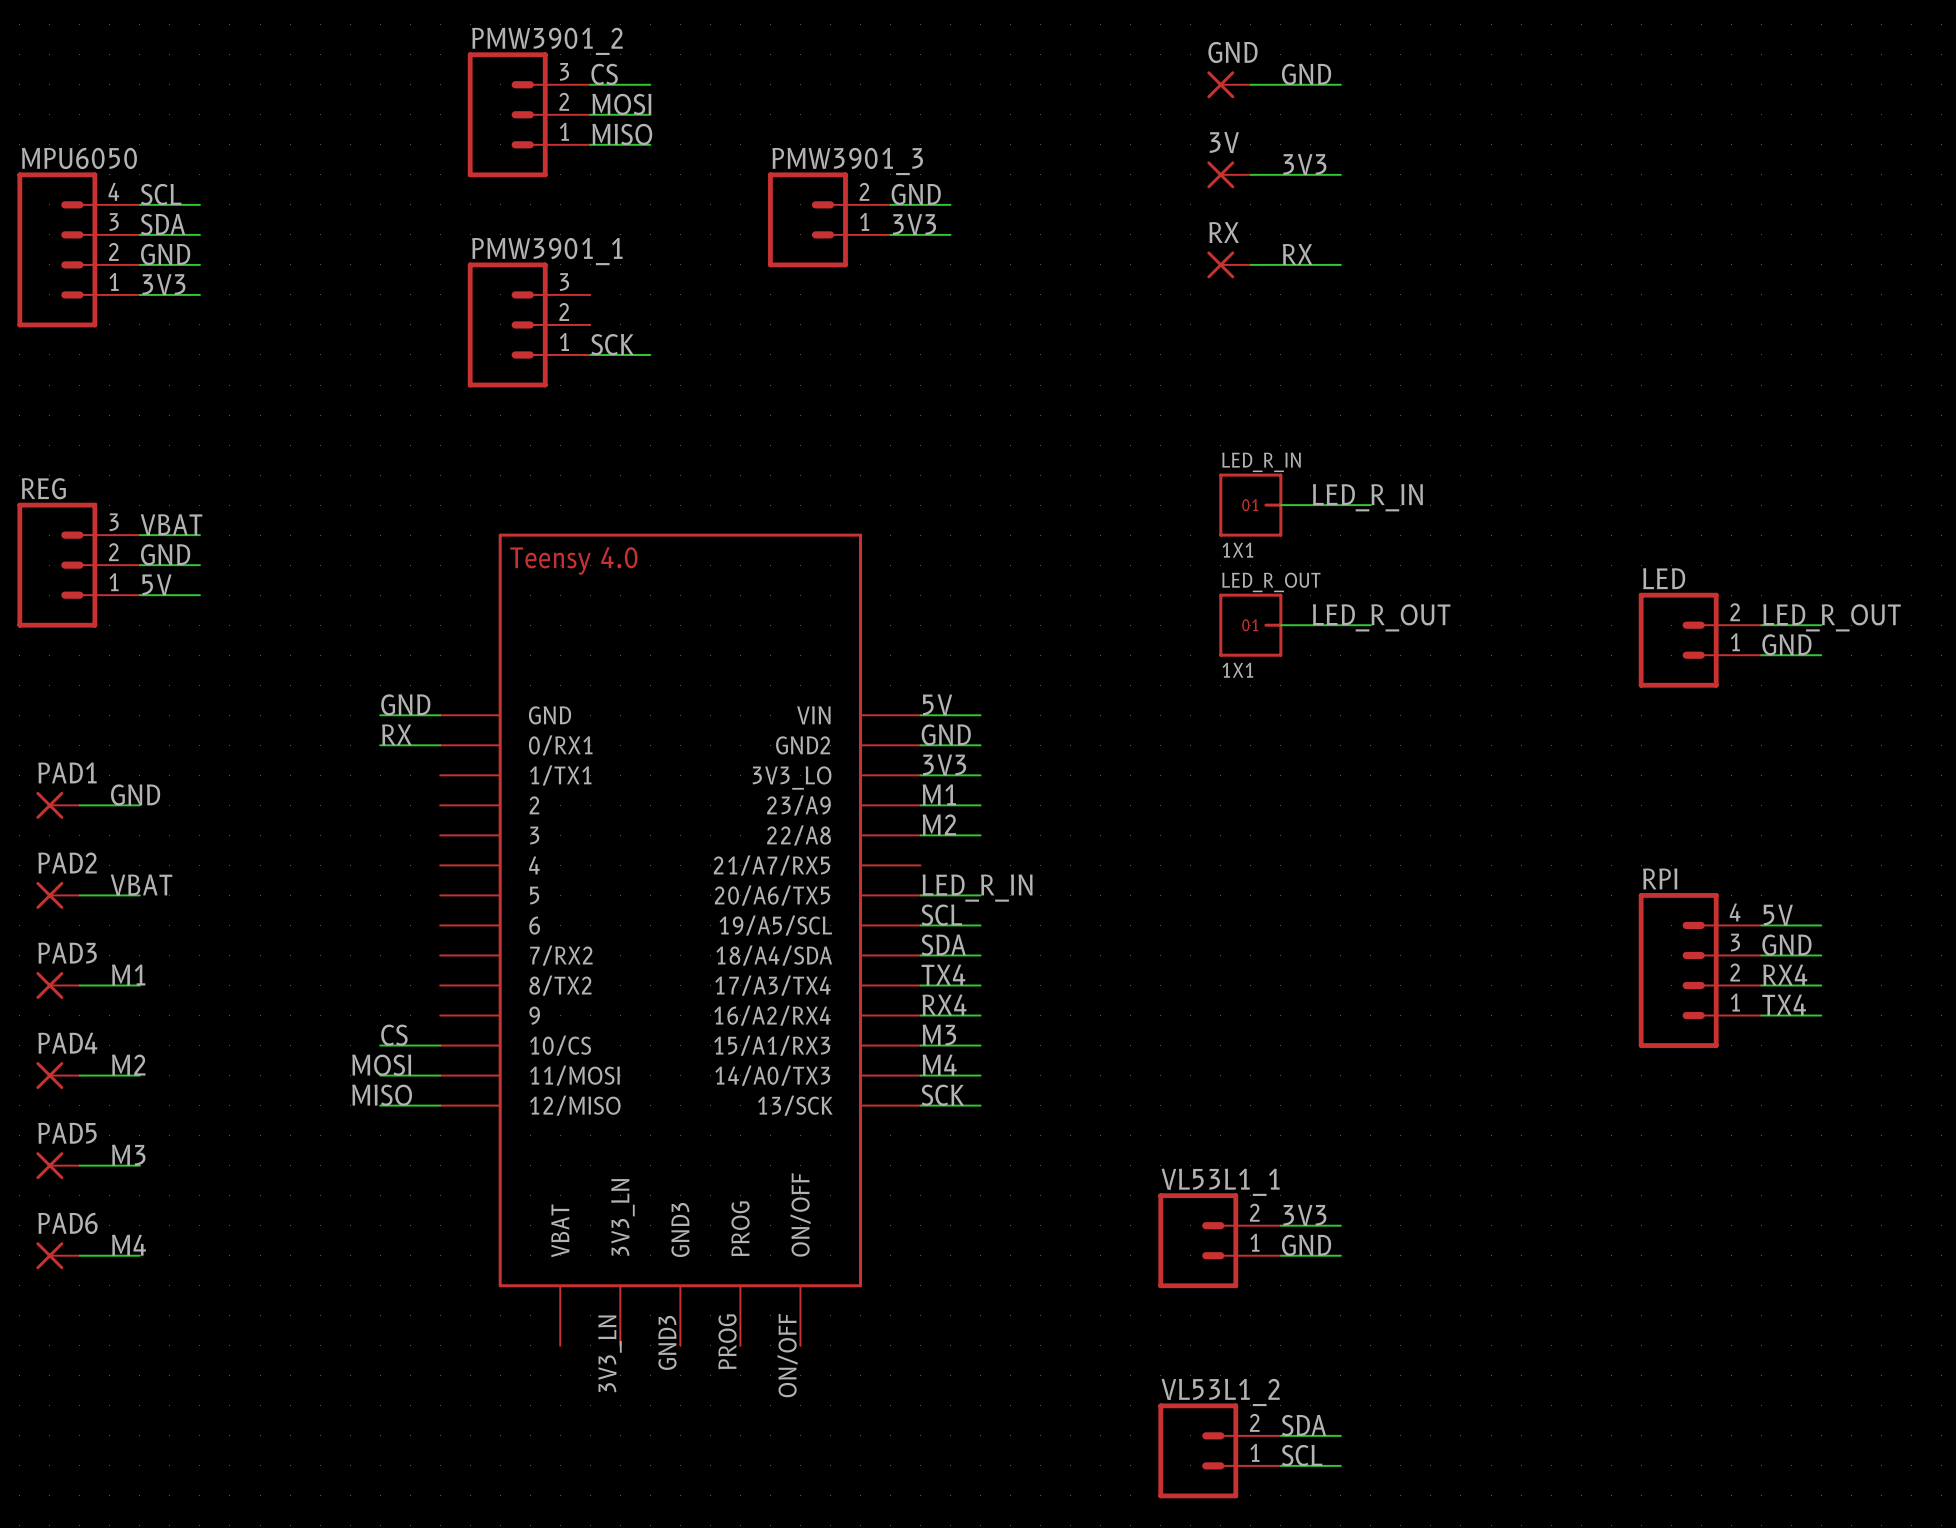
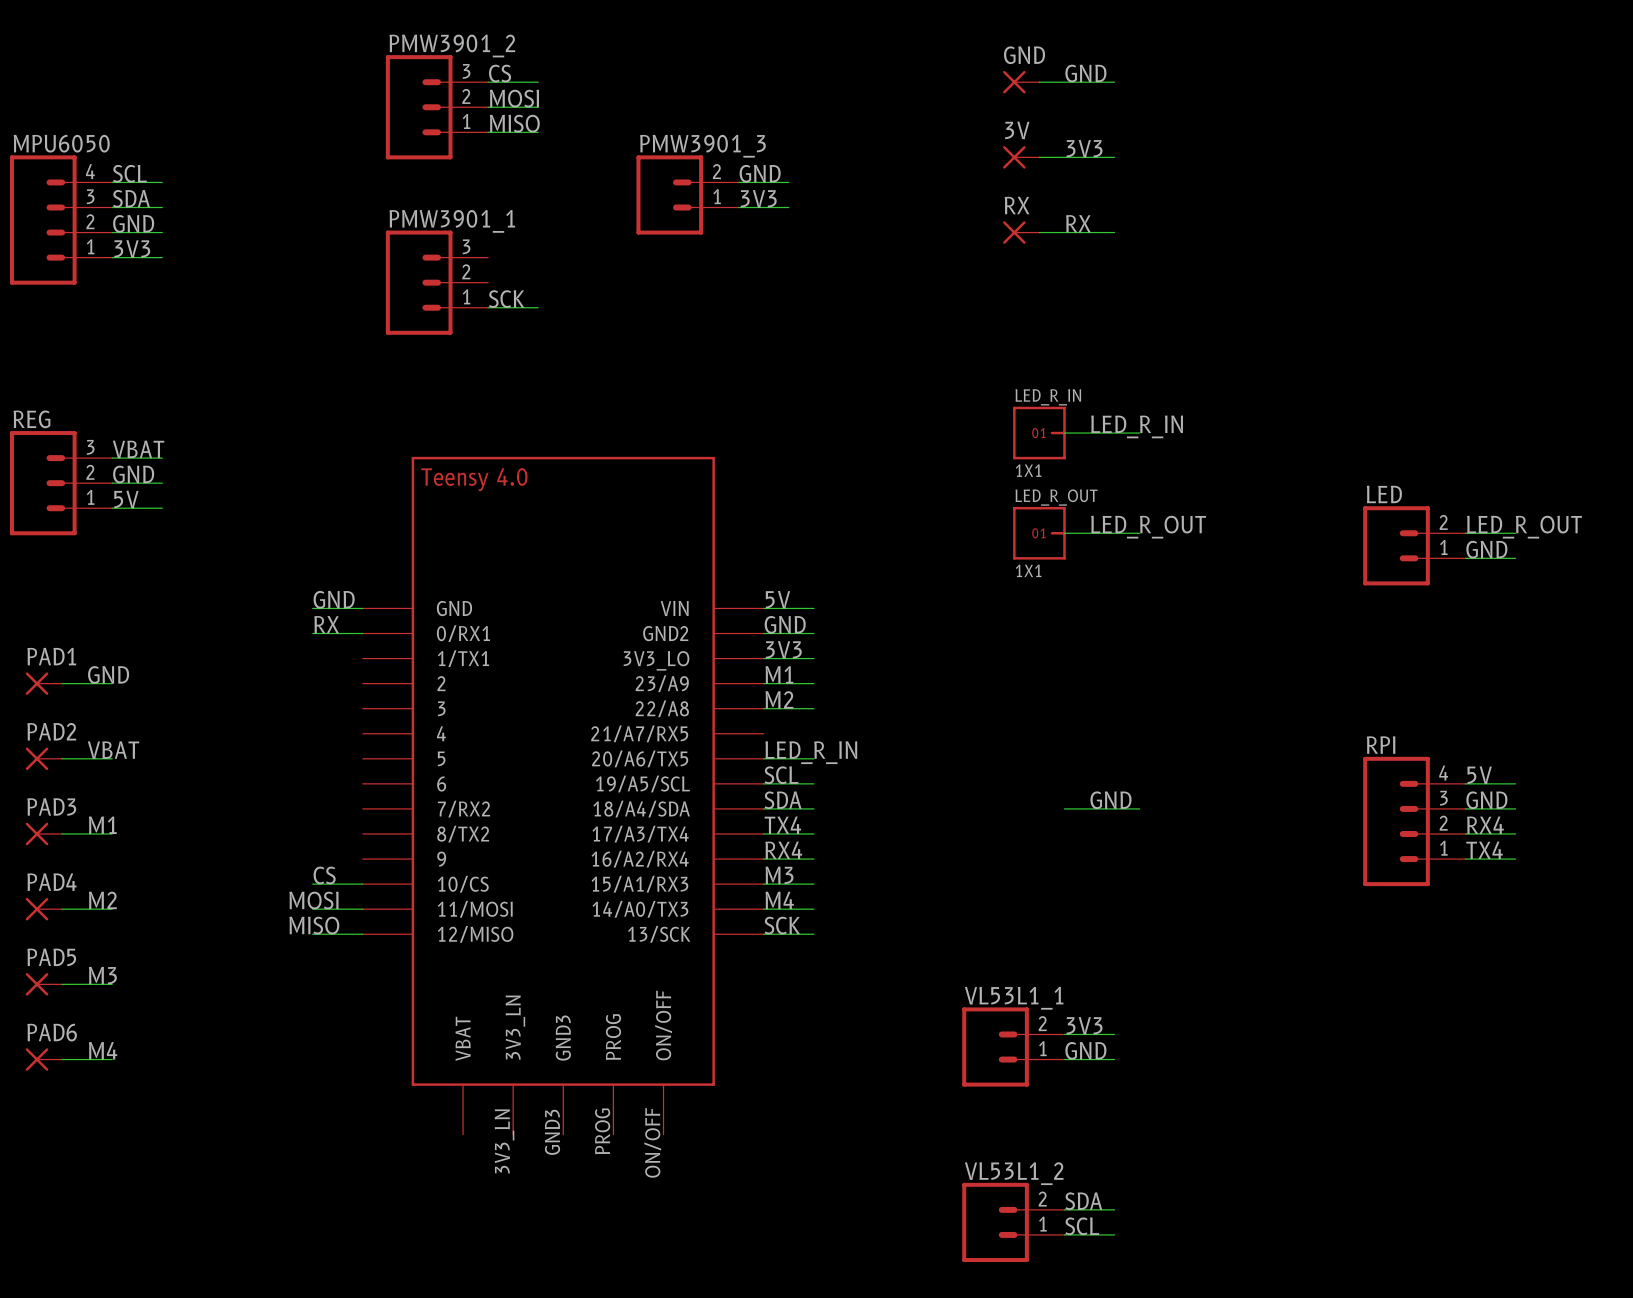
label: none -> GND (1110, 800)
wire: none -> (1064, 808) (1139, 808)

